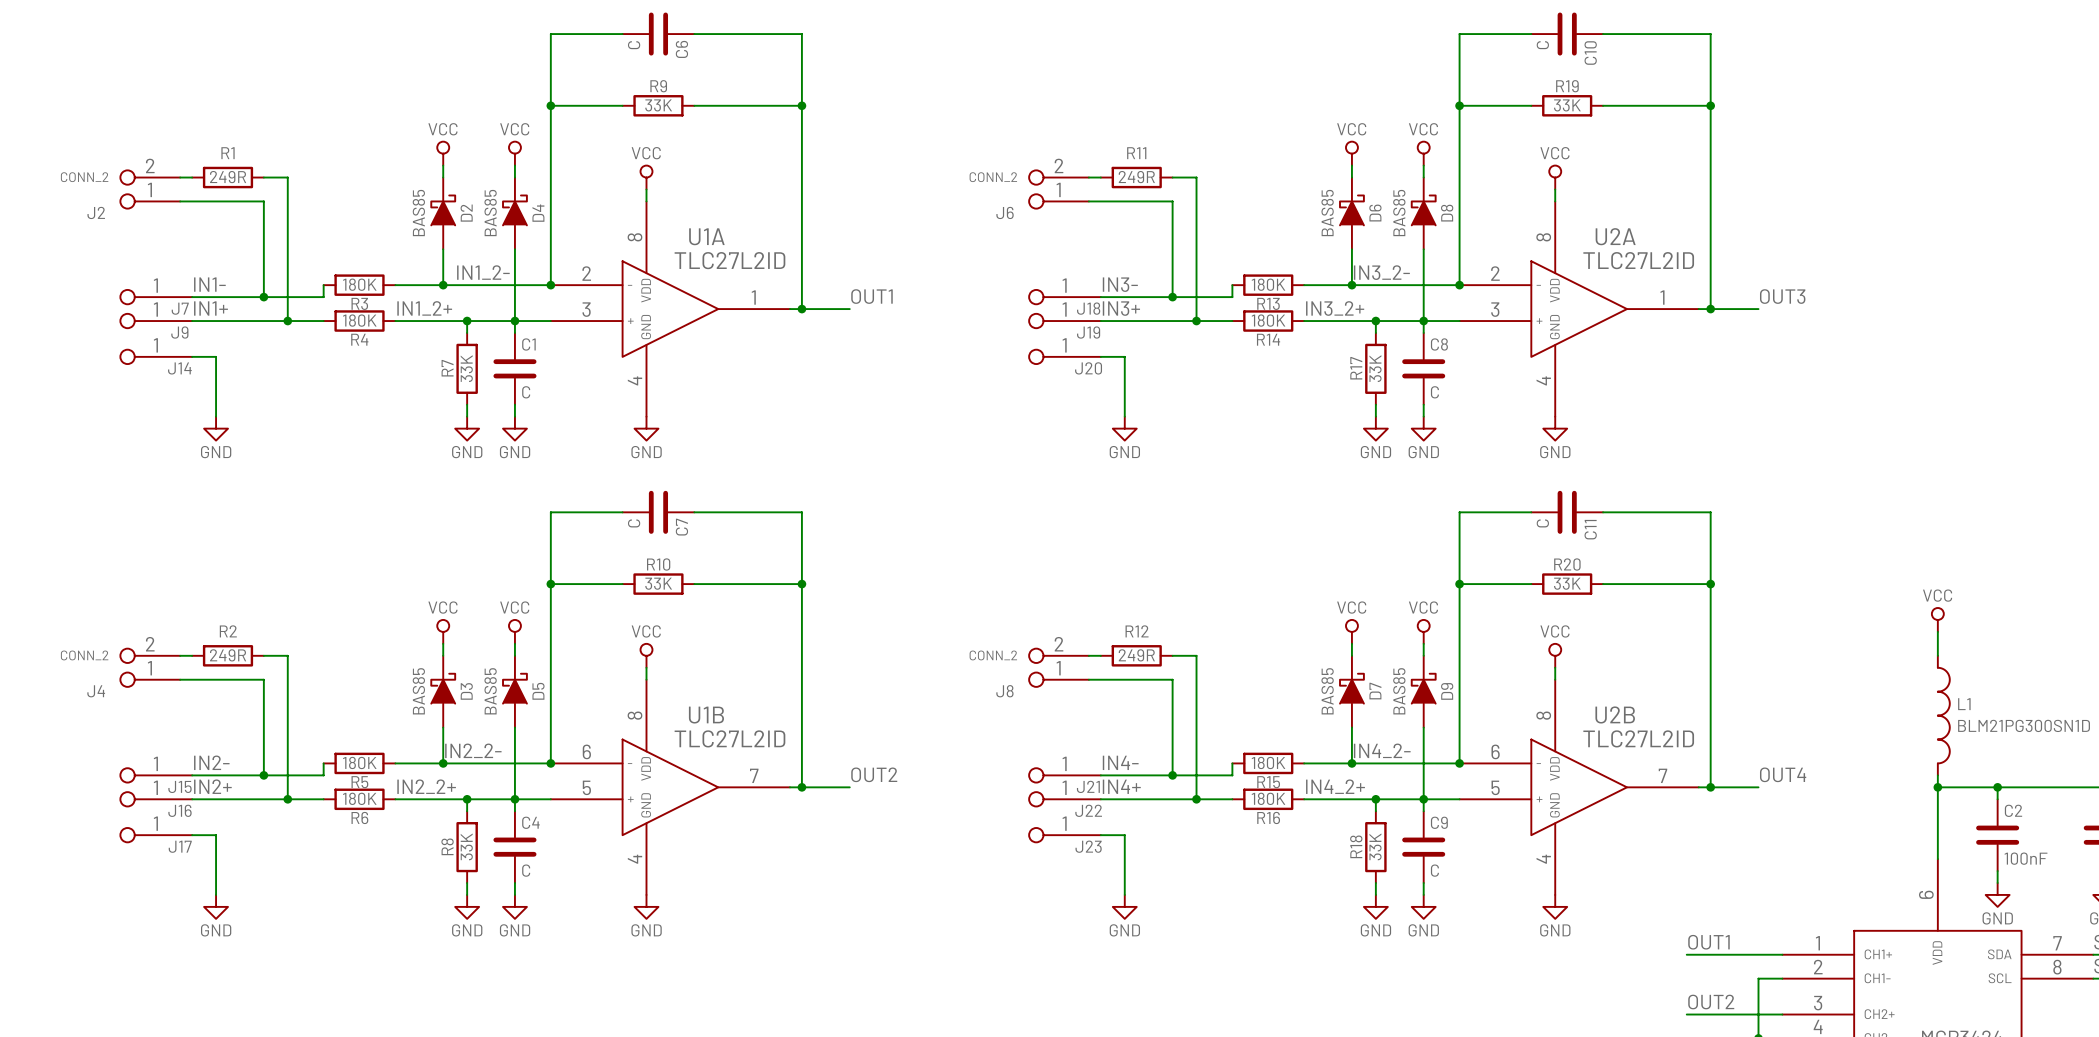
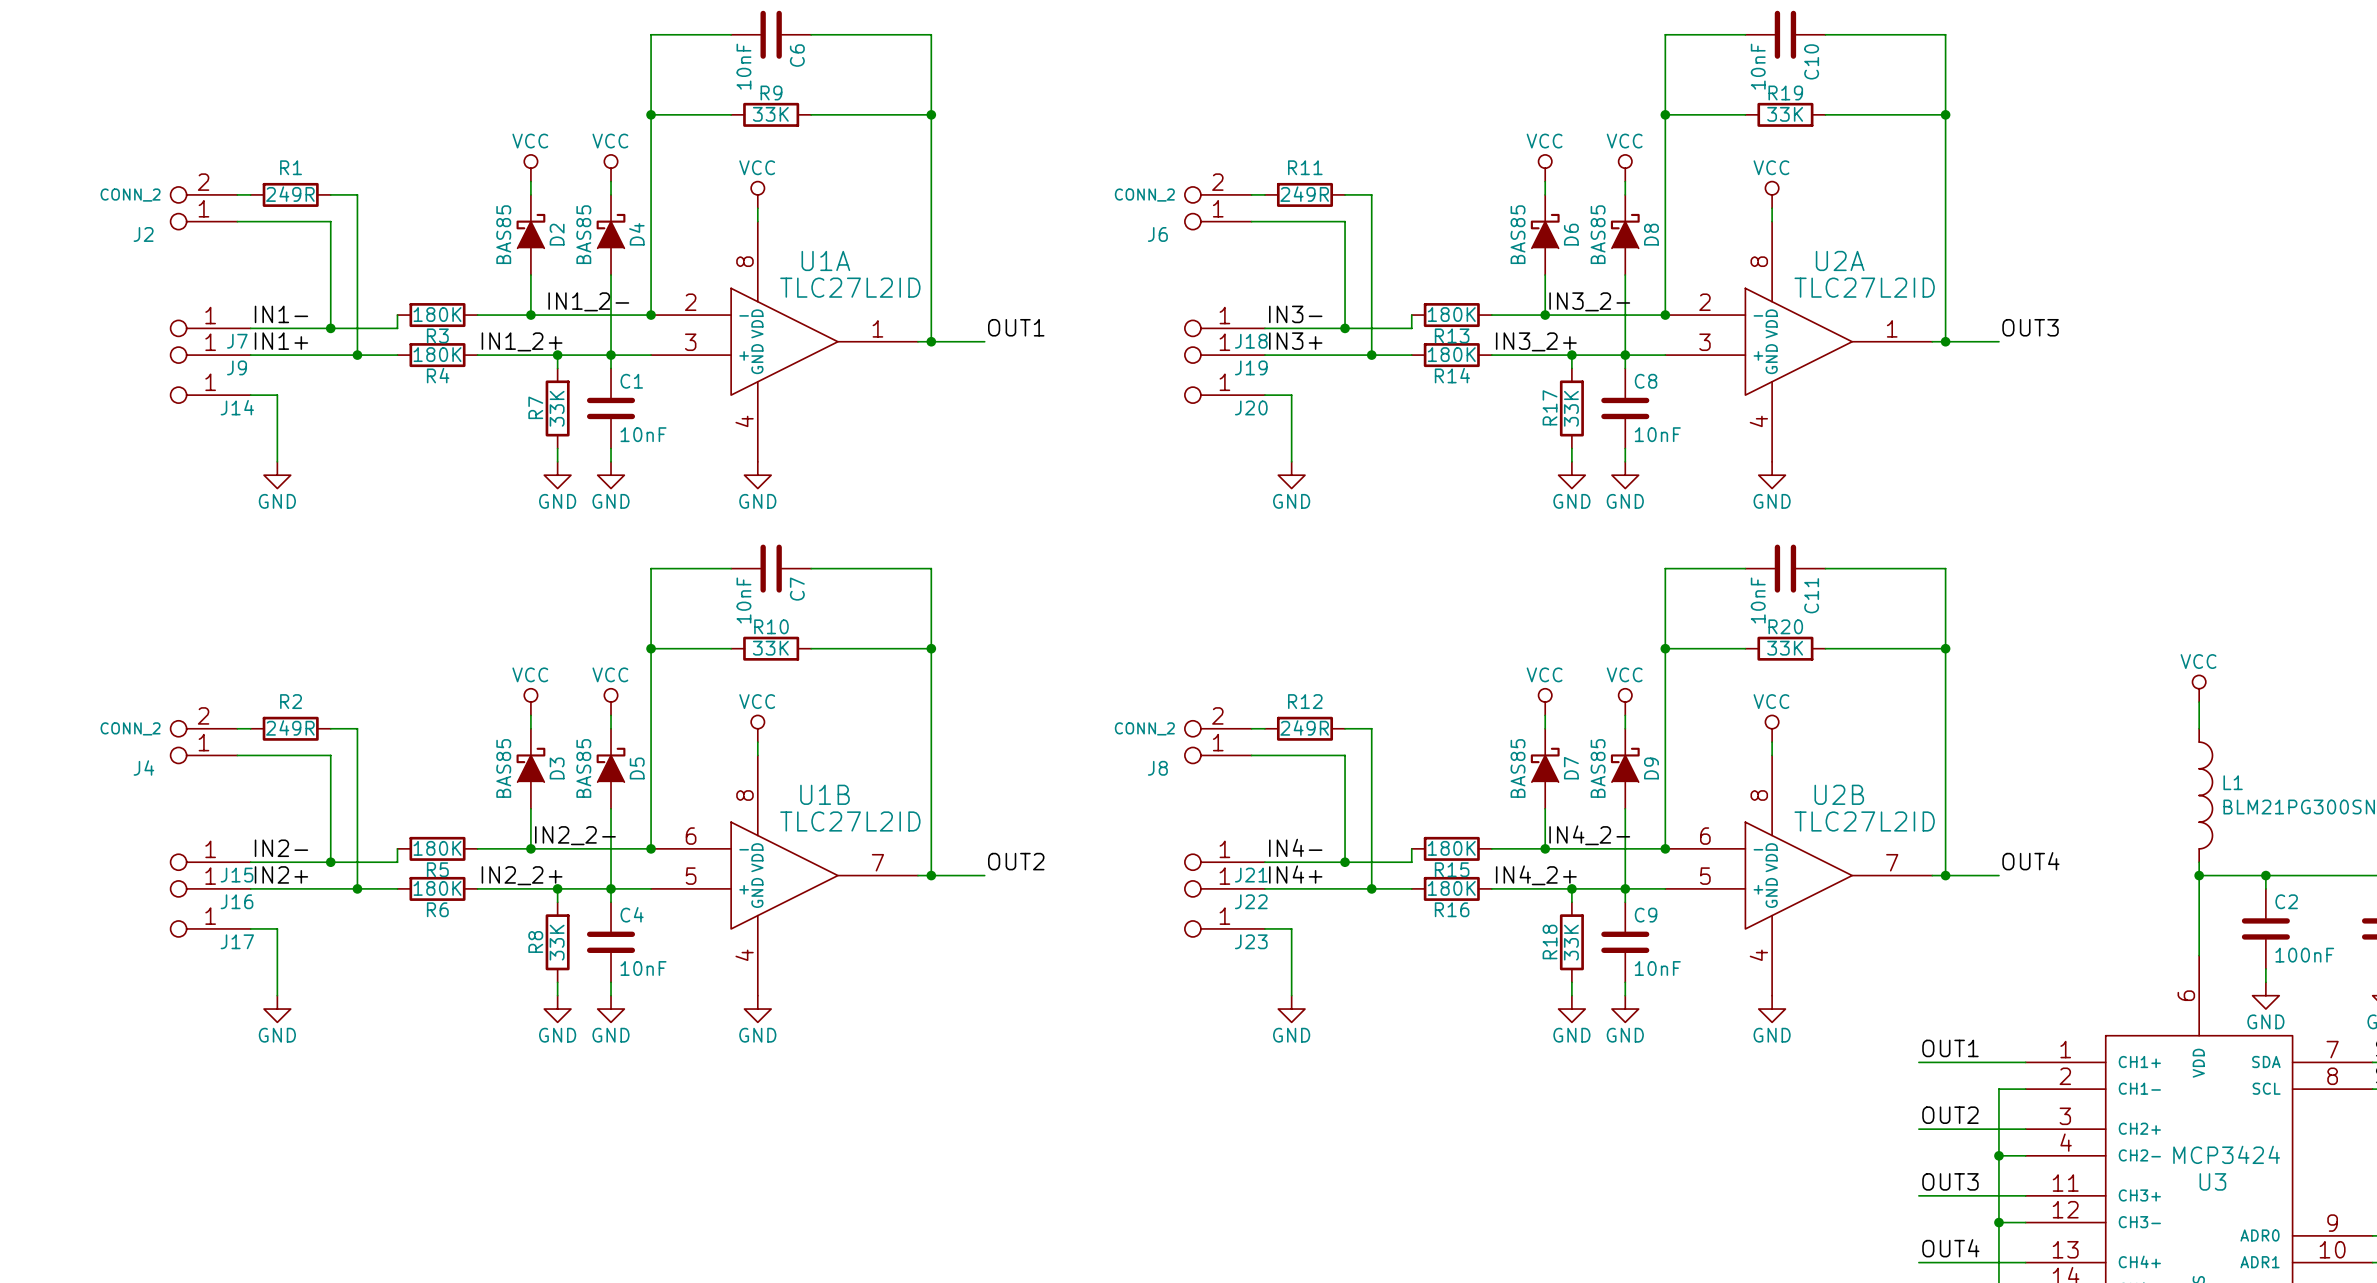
C6 value: C (634, 45) -> 10nF (743, 66)
C10 value: C (1542, 45) -> 10nF (1758, 66)
C1 value: C (526, 392) -> 10nF (643, 434)
C8 value: C (1434, 392) -> 10nF (1657, 434)
C7 value: C (634, 523) -> 10nF (743, 600)
C11 value: C (1542, 523) -> 10nF (1758, 600)
C4 value: C (526, 870) -> 10nF (643, 968)
C9 value: C (1434, 870) -> 10nF (1657, 968)

